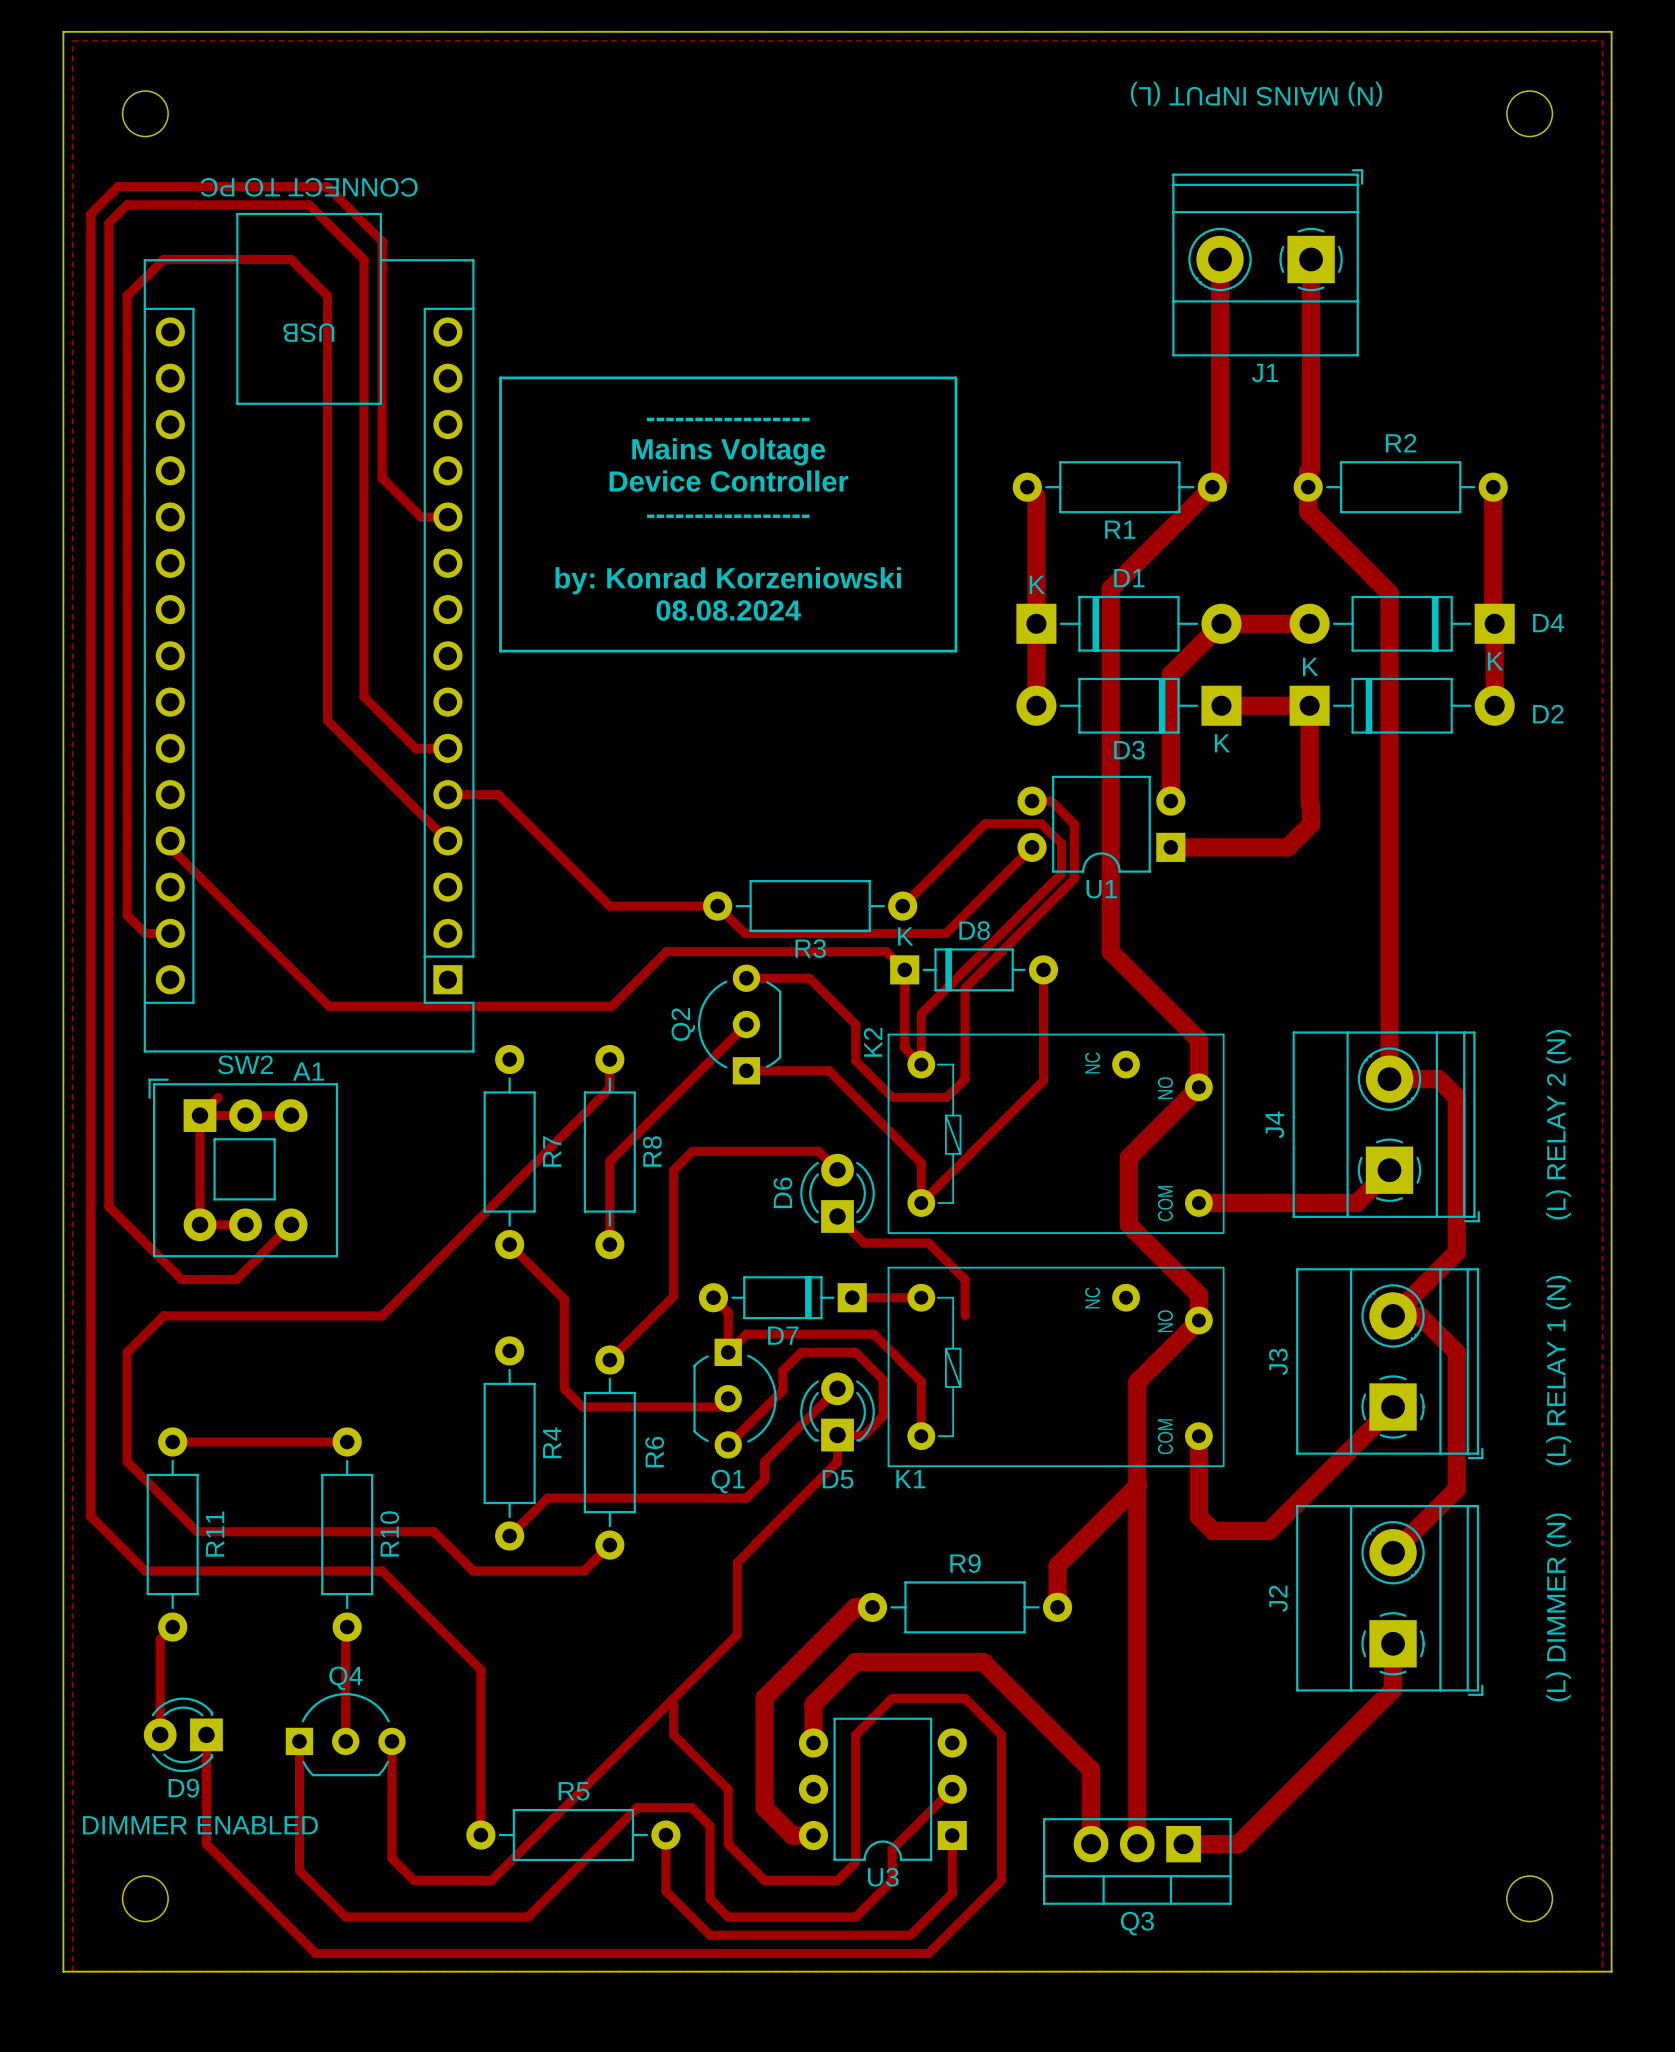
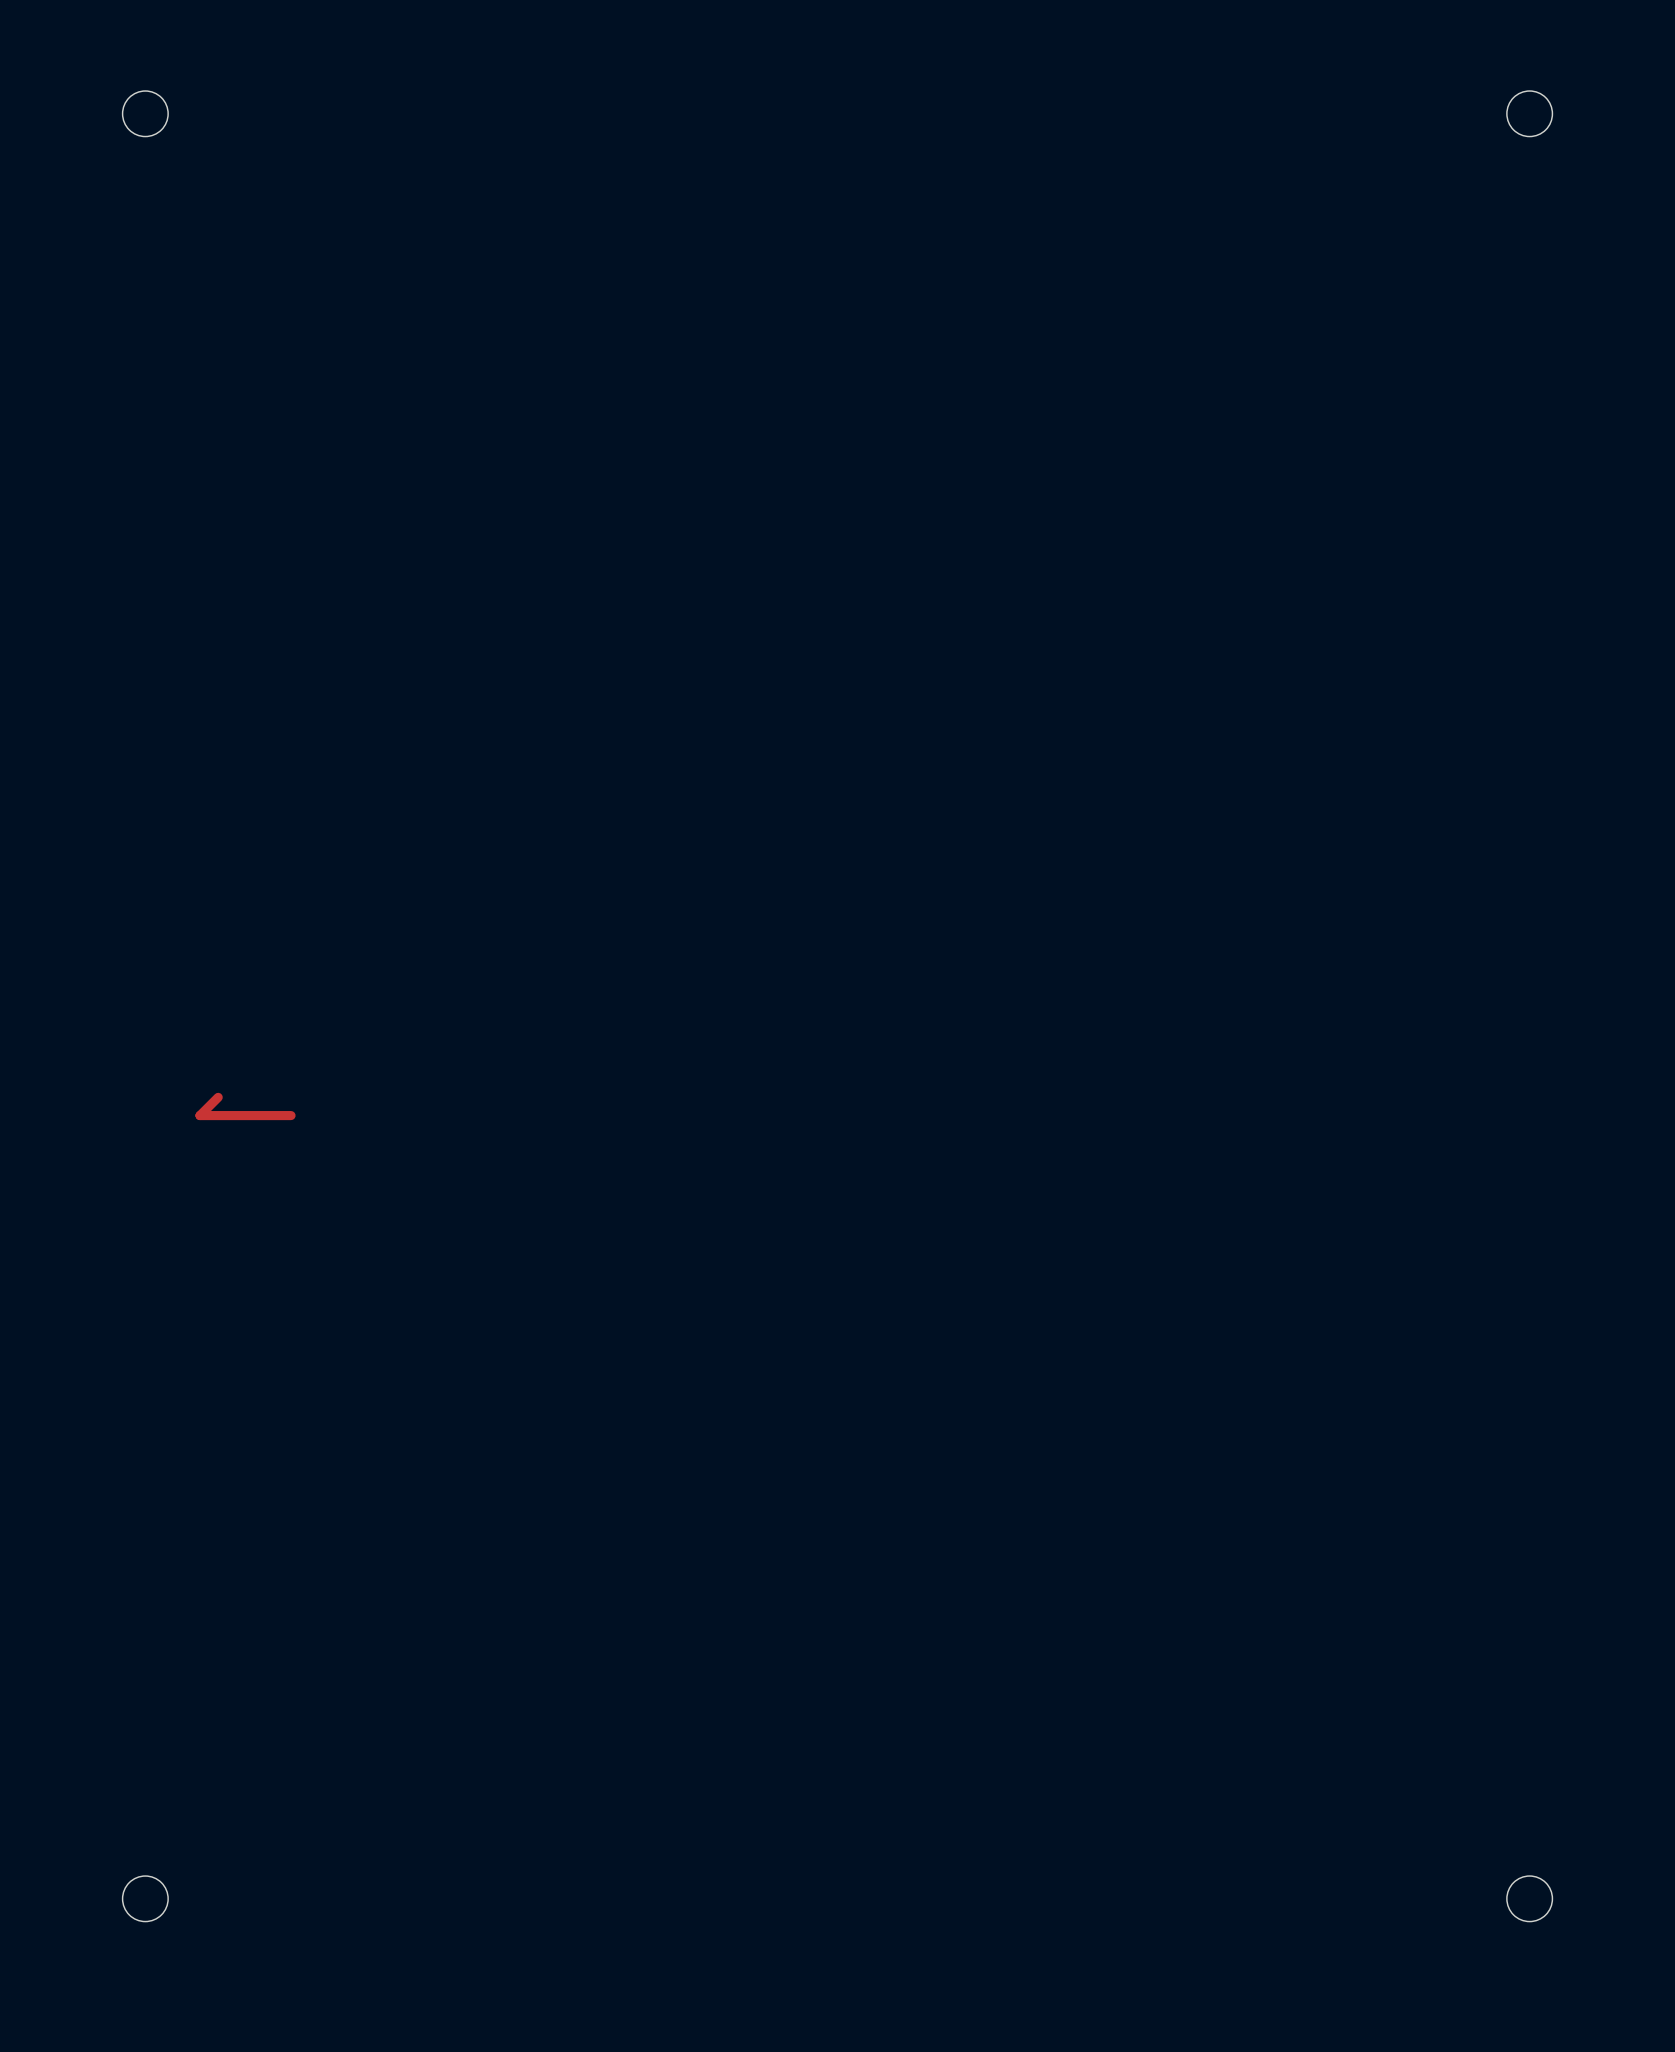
board edge: (63, 31) (1611, 31) (1611, 1971) (63, 1971) (63, 31) -> none
zone outline: (72, 40) (1602, 40) (1602, 1971) (72, 1971) (72, 40) -> none
text: (N) MAINS INPUT (L) (1256, 93) -> none
text: CONNECT TO PC (309, 187) -> none
track: (1220, 259) (1220, 479) (1110, 588) (1110, 951) (1198, 1039) (1198, 1087) (1128, 1157) (1128, 1224) (1198, 1294) (1198, 1320) (1137, 1382) (1137, 1844) -> none
track: (1311, 259) (1311, 468) (1308, 471) (1308, 511) (1389, 592) (1389, 1079) (1438, 1079) (1456, 1097) (1456, 1252) (1393, 1315) (1420, 1315) (1456, 1352) (1456, 1488) (1393, 1552) -> none
J1: (1267, 262) -> none
line: (500, 377) (955, 377) (955, 651) (500, 651) (500, 377) -> none
text: ----------------- (728, 419) -> none
text: Mains Voltage (728, 451) -> none
text: Device Controller (728, 481) -> none
track: (1027, 487) (1036, 496) (1036, 705) -> none
R1: (1119, 487) -> none
R2: (1400, 487) -> none
track: (1493, 487) (1494, 705) -> none
text: ----------------- (728, 516) -> none
track: (447, 517) (421, 517) (382, 478) (382, 241) (327, 186) (118, 186) (90, 213) (90, 1516) (145, 1570) (382, 1570) (480, 1669) (480, 1835) -> none
text: by: Konrad Korzeniowski (728, 580) -> none
text: 08.08.2024 (728, 610) -> none
D1: (1128, 623) -> none
track: (1309, 623) (1221, 623) (1170, 674) (1170, 801) -> none
D2: (1402, 623) -> none
A1: (309, 632) -> none
D3: (1128, 705) -> none
track: (1221, 705) (1309, 705) (1311, 824) (1287, 847) (1170, 847) -> none
D4: (1402, 705) -> none
track: (441, 748) (415, 748) (363, 696) (363, 259) (309, 204) (127, 204) (108, 223) (108, 1206) (181, 1279) (236, 1279) (291, 1224) -> none
track: (447, 794) (498, 794) (609, 906) (717, 906) (744, 933) (945, 933) (1032, 847) -> none
track: (1032, 801) (1051, 801) (1074, 824) (1074, 878) (965, 988) (965, 1079) (946, 1097) (892, 1097) (855, 1060) (855, 1024) (809, 978) (746, 978) -> none
U1: (1101, 824) -> none
track: (163, 840) (328, 1006) (611, 1006) (666, 951) (886, 951) (904, 969) (904, 1048) (921, 1064) (921, 1013) (1061, 873) (1061, 843) (1041, 823) (984, 823) (902, 906) -> none
track: (447, 840) (327, 720) (327, 295) (291, 259) (163, 259) (127, 295) (127, 915) (145, 933) (170, 933) -> none
R3: (810, 906) -> none
D8: (974, 969) -> none
track: (1043, 969) (1043, 1080) (921, 1203) (921, 1162) (829, 1070) (746, 1070) -> none
Q2: (739, 1024) -> none
track: (746, 1024) (609, 1161) (609, 1244) -> none
track: (609, 1059) (609, 1088) (382, 1315) (163, 1315) (127, 1352) (127, 1461) (197, 1531) (434, 1531) (473, 1570) (583, 1570) (609, 1545) -> none
track: (200, 1115) (200, 1224) (245, 1224) -> none
text: (L) RELAY 2 (N) (1558, 1124) -> none
J4: (1386, 1126) -> none
K2: (1056, 1133) -> none
R7: (509, 1152) -> none
R8: (609, 1152) -> none
SW2: (243, 1167) -> none
track: (837, 1170) (818, 1151) (692, 1151) (673, 1170) (673, 1296) (609, 1360) -> none
track: (1389, 1170) (1356, 1203) (1198, 1203) -> none
D6: (837, 1193) -> none
track: (837, 1216) (864, 1243) (928, 1243) (965, 1279) (965, 1315) -> none
track: (509, 1244) (564, 1299) (564, 1388) (582, 1407) (719, 1407) (728, 1398) -> none
track: (713, 1297) (728, 1312) (728, 1352) (746, 1334) (873, 1334) (921, 1381) (921, 1436) -> none
D7: (782, 1297) -> none
track: (852, 1297) (921, 1297) -> none
J3: (1389, 1363) -> none
part: (1056, 1366) -> none
text: (L) RELAY 1 (N) (1558, 1370) -> none
track: (837, 1388) (764, 1461) (764, 1479) (746, 1498) (547, 1498) (509, 1535) -> none
Q1: (735, 1398) -> none
track: (1393, 1407) (1269, 1530) (1213, 1530) (1198, 1516) (1198, 1436) -> none
D5: (837, 1411) -> none
track: (172, 1441) (347, 1441) -> none
R4: (509, 1443) -> none
track: (728, 1444) (782, 1390) (782, 1370) (801, 1352) (855, 1352) (883, 1379) (883, 1416) (864, 1435) (837, 1435) (837, 1461) (737, 1562) (737, 1634) (491, 1880) (414, 1880) (391, 1858) (391, 1741) -> none
R6: (609, 1452) -> none
text: K1 (910, 1479) -> none
track: (1137, 1485) (1057, 1565) (1057, 1607) -> none
R11: (172, 1534) -> none
R10: (347, 1534) -> none
J2: (1389, 1600) -> none
track: (872, 1607) (854, 1607) (764, 1697) (764, 1807) (792, 1835) (813, 1835) -> none
R9: (965, 1607) -> none
text: (L) DIMMER (N) (1558, 1607) -> none
track: (172, 1627) (160, 1639) (160, 1734) -> none
track: (347, 1627) (345, 1741) -> none
track: (1393, 1643) (1393, 1689) (1238, 1844) (1183, 1844) -> none
track: (673, 1698) (673, 1734) (728, 1789) (728, 1844) (764, 1880) (837, 1880) (855, 1862) (855, 1734) (892, 1698) (965, 1698) (1001, 1734) (1001, 1880) (928, 1953) (315, 1953) (206, 1844) (206, 1734) -> none
D9: (183, 1734) -> none
Q4: (345, 1734) -> none
track: (299, 1741) (299, 1870) (345, 1917) (527, 1917) (637, 1807) (691, 1807) (710, 1825) (710, 1898) (728, 1917) (855, 1917) (892, 1880) (892, 1849) (952, 1789) -> none
track: (813, 1742) (813, 1704) (855, 1662) (983, 1662) (1091, 1769) (1091, 1844) -> none
U3: (882, 1789) -> none
text: DIMMER ENABLED (200, 1825) -> none
R5: (573, 1835) -> none
track: (665, 1835) (665, 1891) (710, 1935) (910, 1935) (952, 1893) (952, 1835) -> none
Q3: (1137, 1861) -> none

